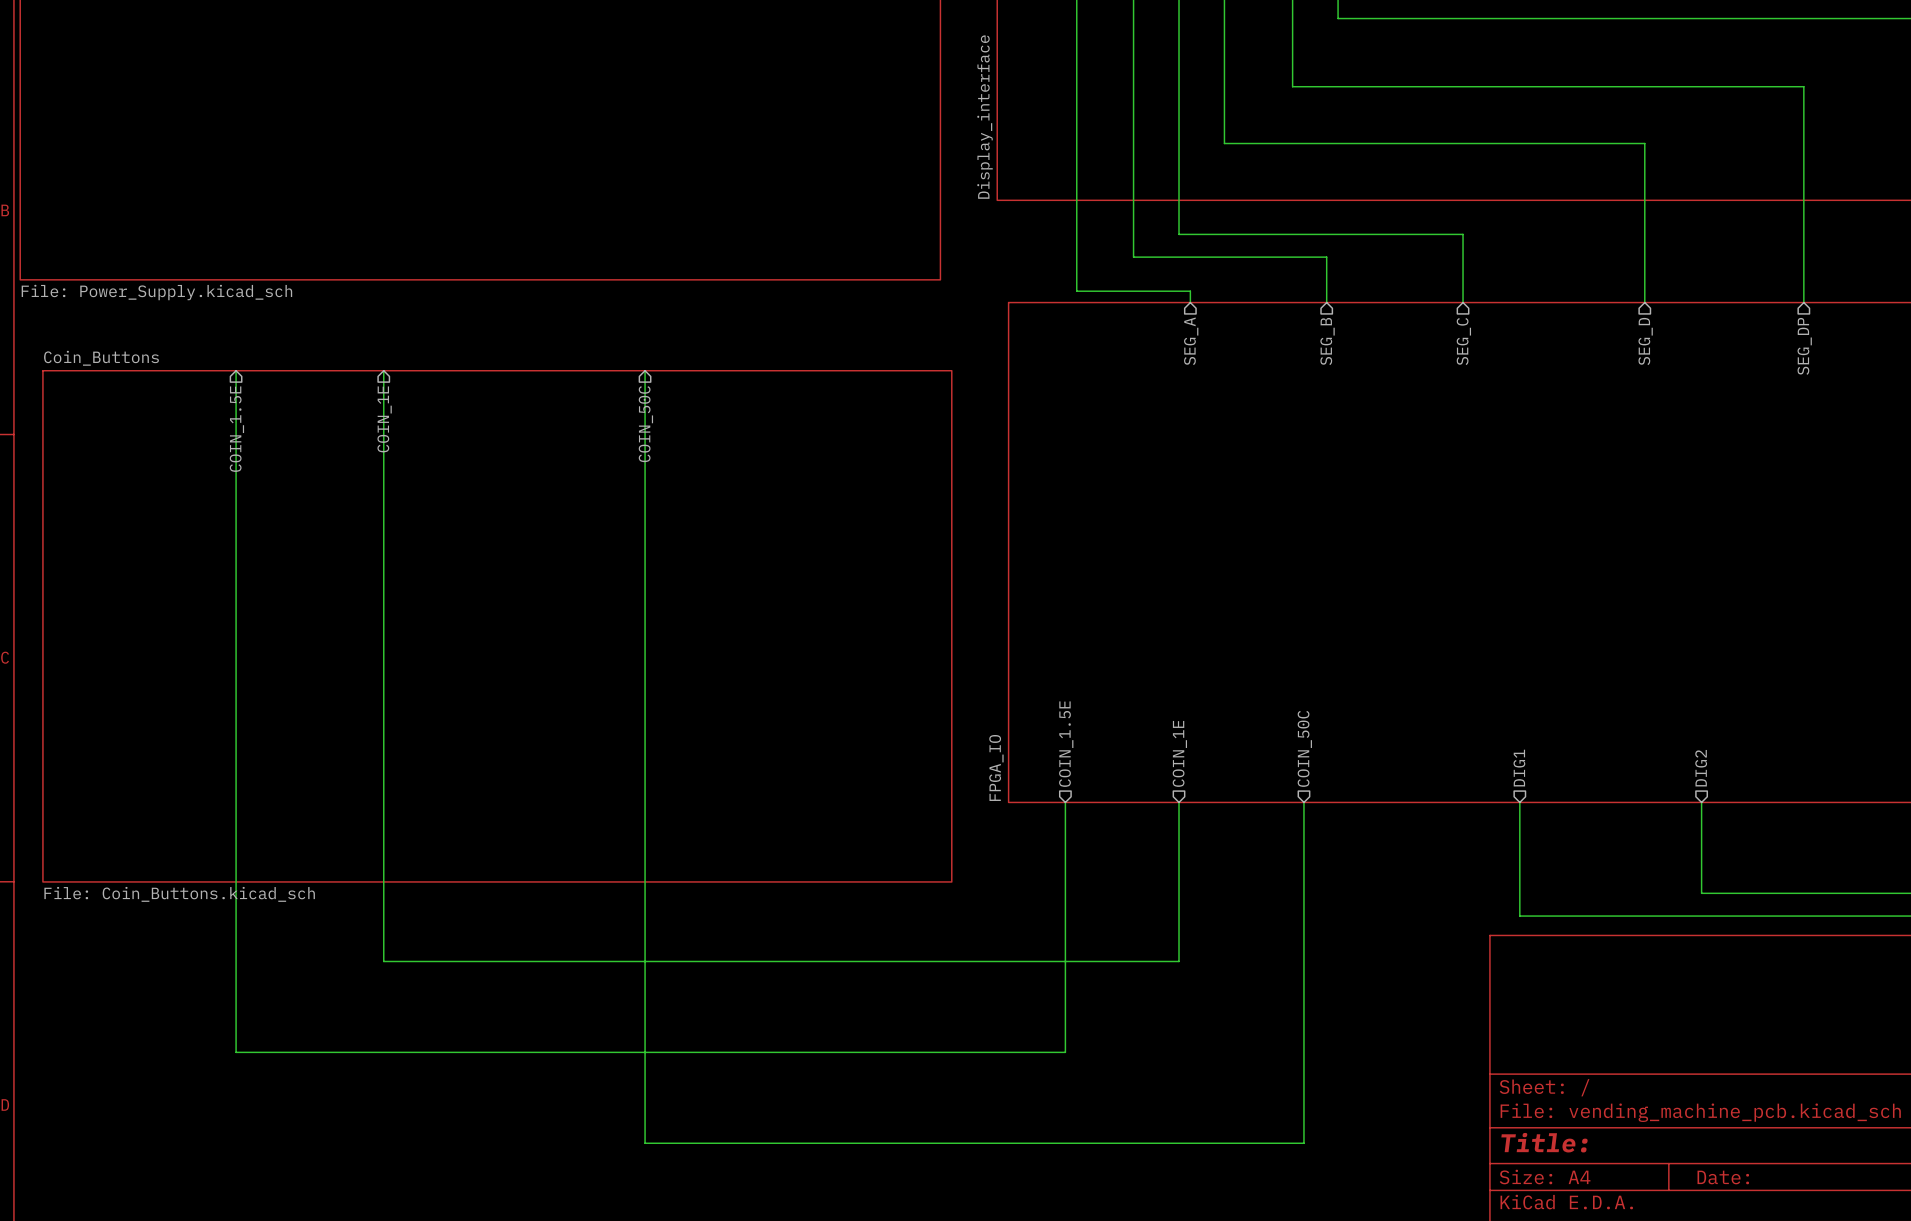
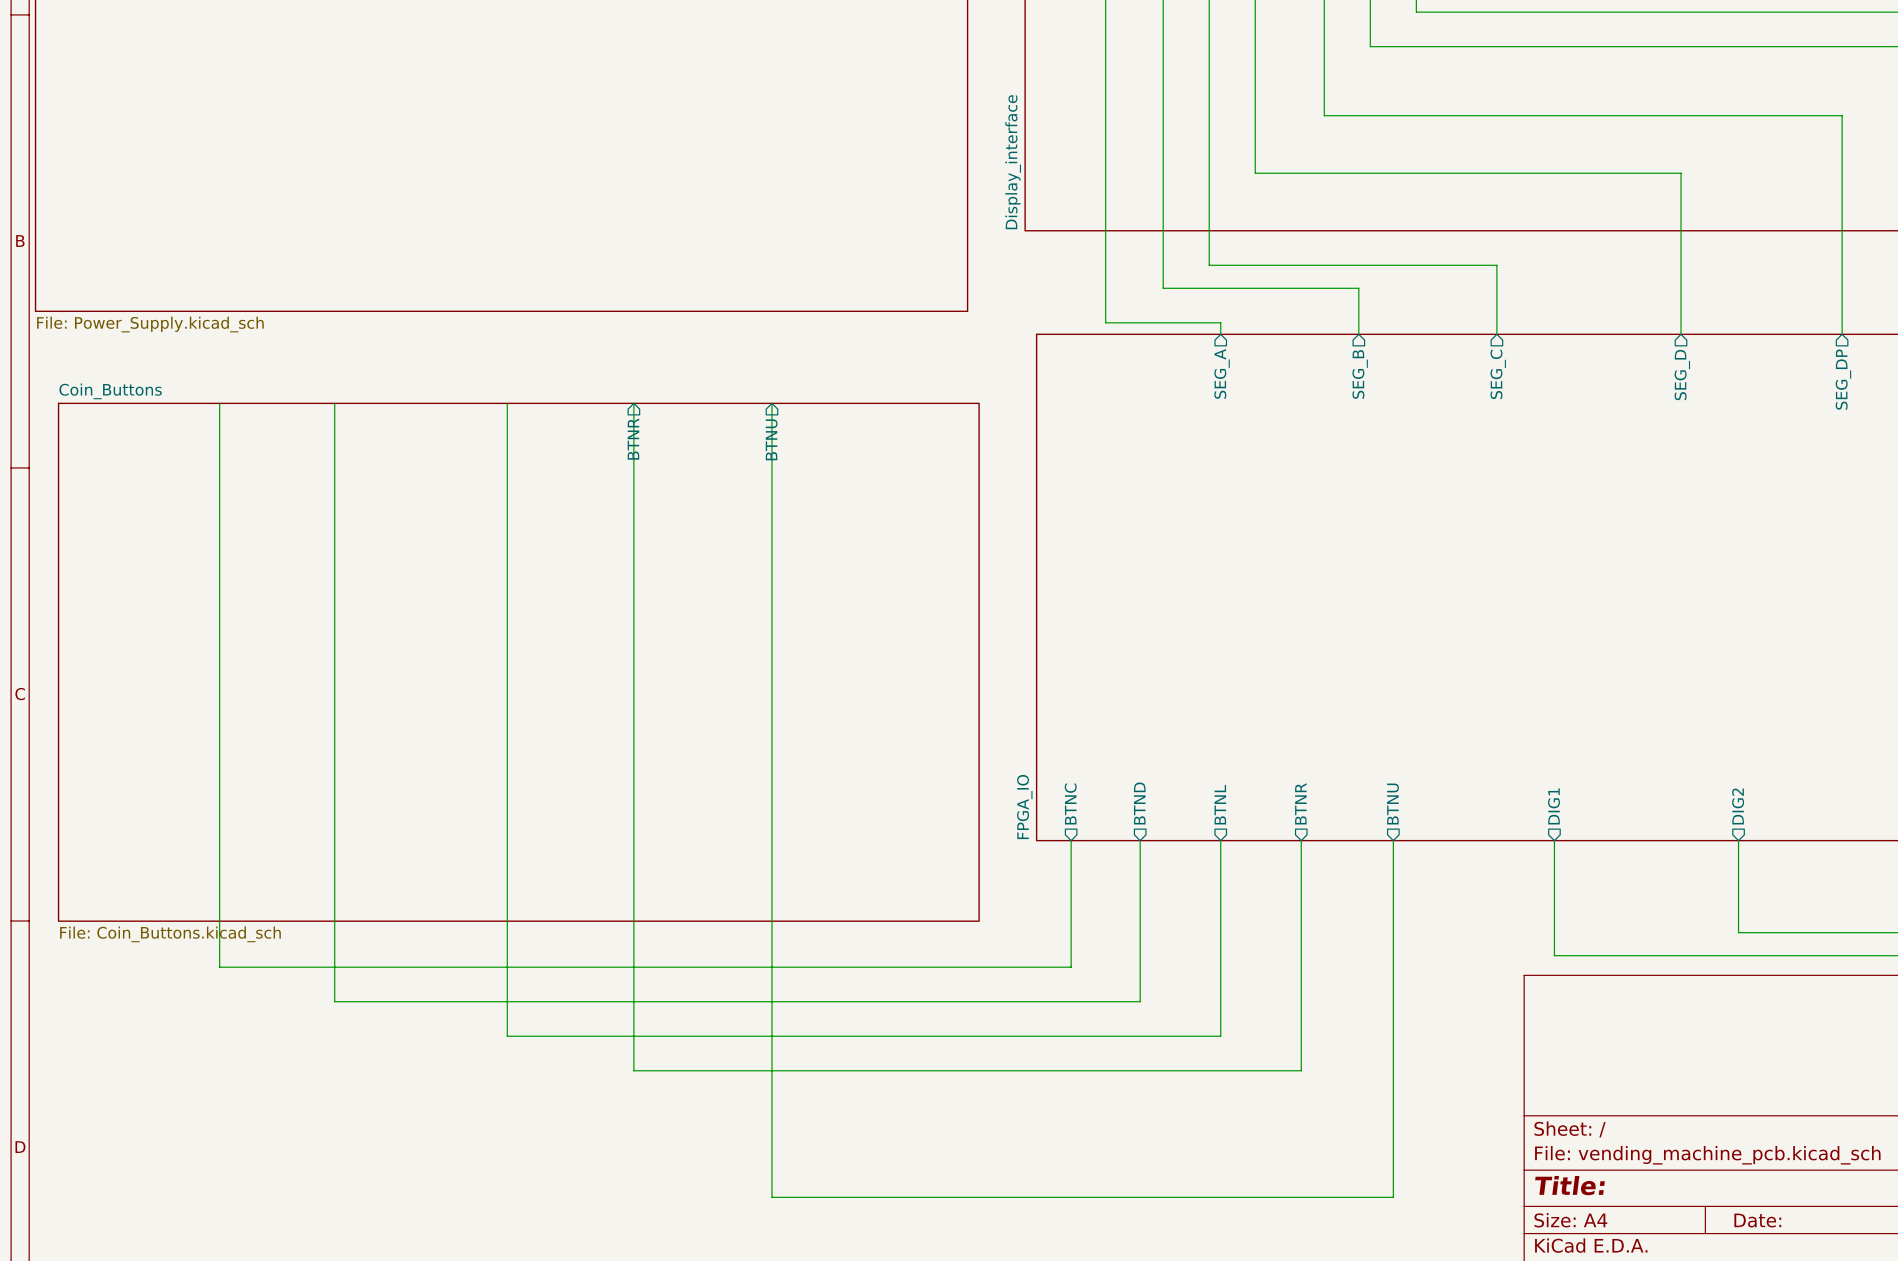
wire: none -> (219, 403) (219, 967) (1071, 967) (1071, 840)
wire: (236, 370) (236, 1052) (1065, 1052) (1065, 802) -> none
wire: (383, 370) (383, 961) -> (334, 403) (334, 1001) (403, 1001)
wire: none -> (507, 403) (507, 1036) (1220, 1036) (1220, 840)
wire: none -> (633, 403) (633, 1070) (1301, 1070) (1301, 840)
wire: (645, 370) (645, 1143) (1303, 1143) (1303, 802) -> none
wire: none -> (771, 403) (771, 1197) (1393, 1197) (1393, 840)
sheet pin: none -> BTNR (633, 439)
sheet pin: none -> BTNU (771, 439)
sheet pin: COIN_1E (384, 419) -> none
sheet pin: COIN_50C (645, 424) -> none
sheet pin: COIN_1.5E (236, 429) -> none
sheet pin: COIN_1.5E (1066, 744) -> none
sheet pin: COIN_50C (1304, 748) -> none
sheet pin: COIN_1E (1179, 753) -> none
sheet pin: none -> BTNC (1070, 804)
sheet pin: none -> BTND (1139, 803)
sheet pin: none -> BTNL (1220, 804)
sheet pin: none -> BTNR (1300, 803)
sheet pin: none -> BTNU (1393, 804)
wire: (1179, 802) (1179, 961) (1110, 961) -> (1140, 840) (1140, 1001)

